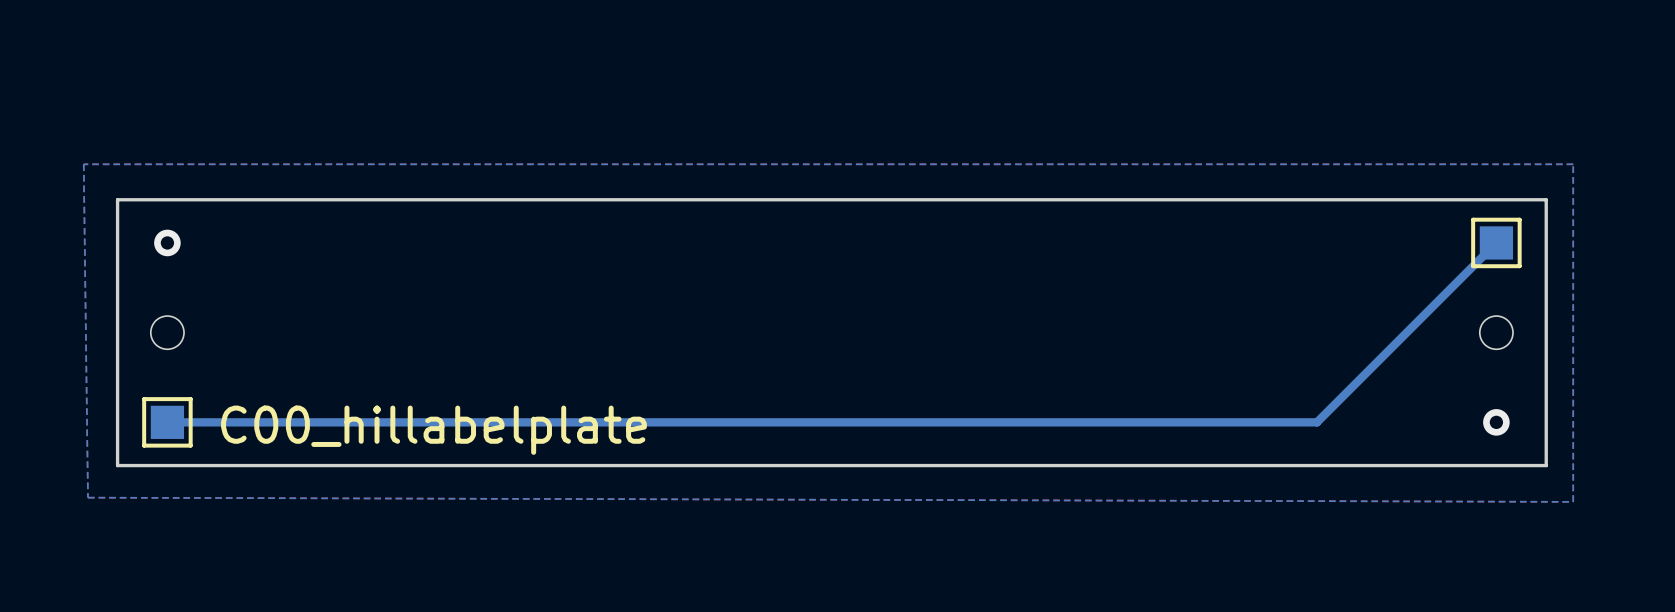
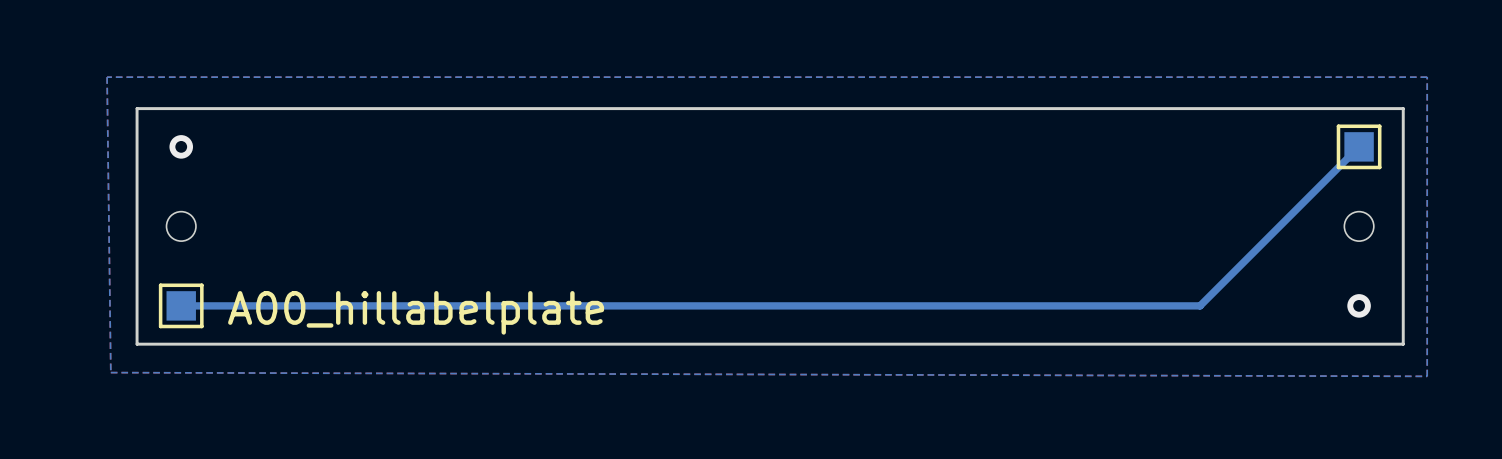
text: C00_hillabelplate (433, 430) -> A00_hillabelplate (416, 312)

